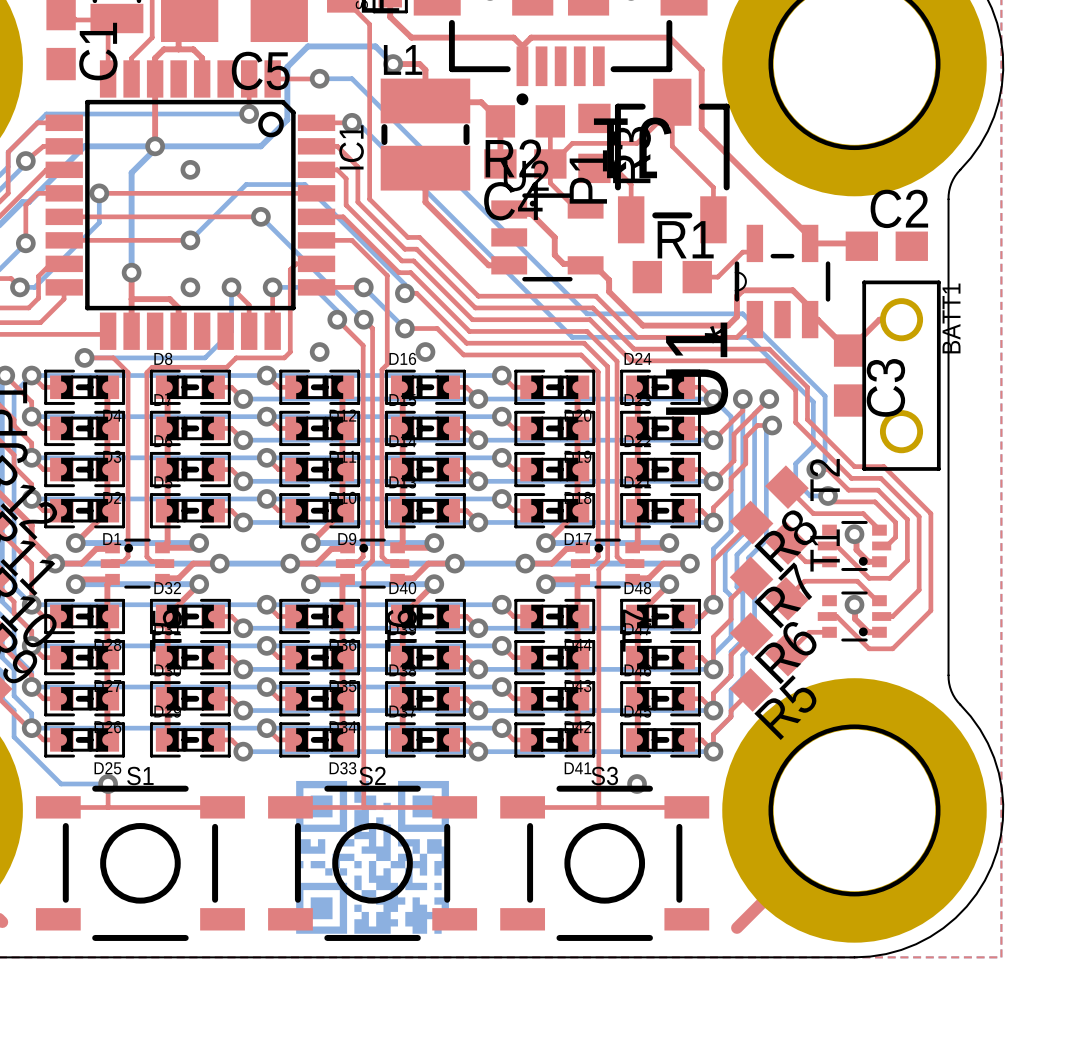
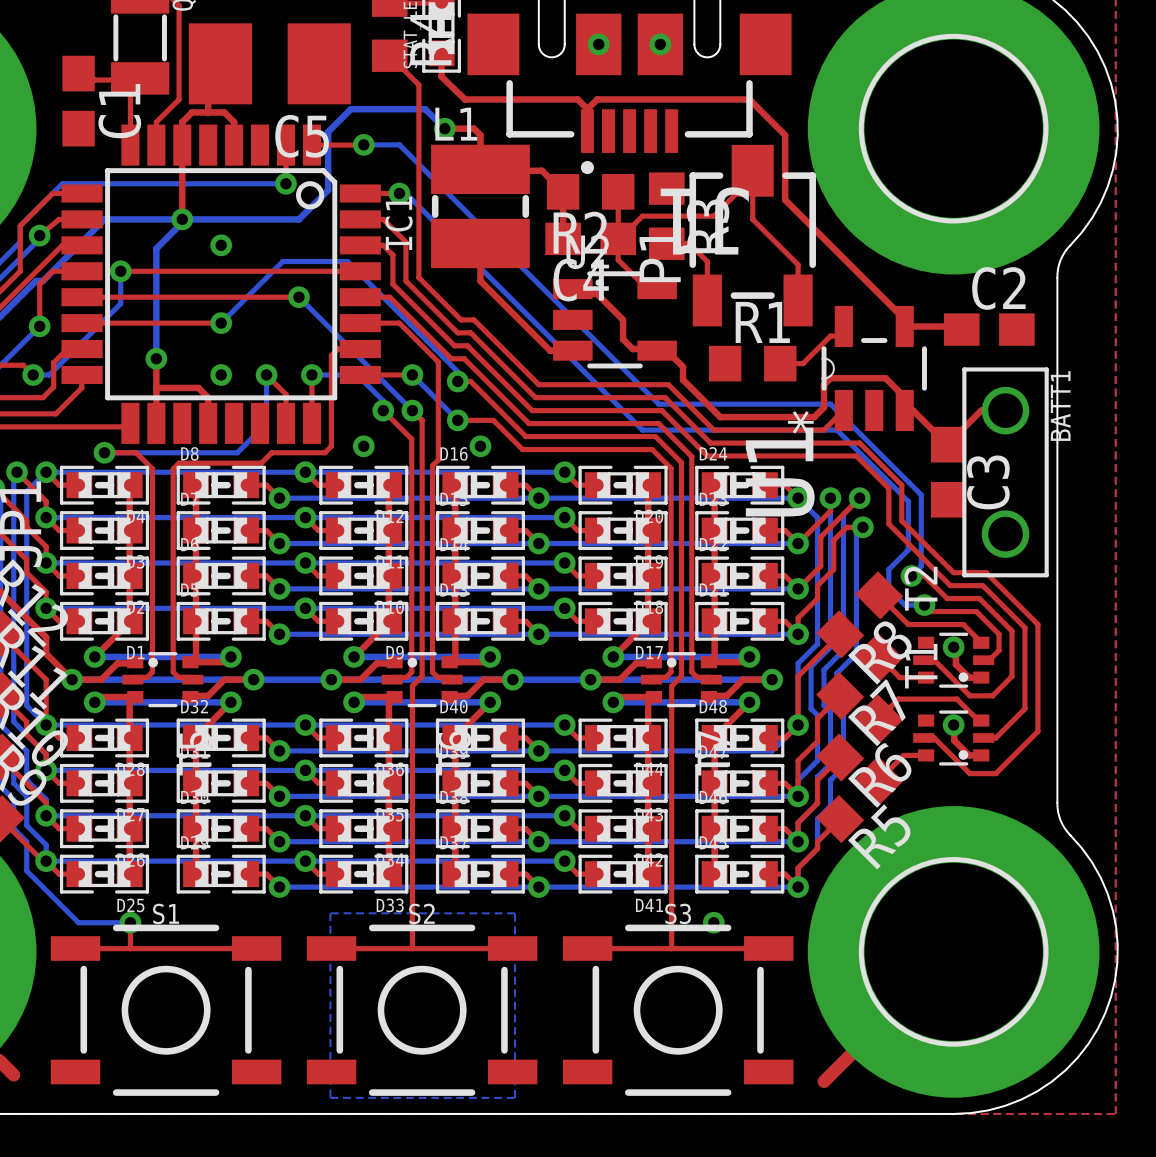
bottom zone outline: none -> (330, 913) (515, 913) (515, 1097) (330, 1097) (330, 913)
drawing: [296, 780, 449, 934] -> none

